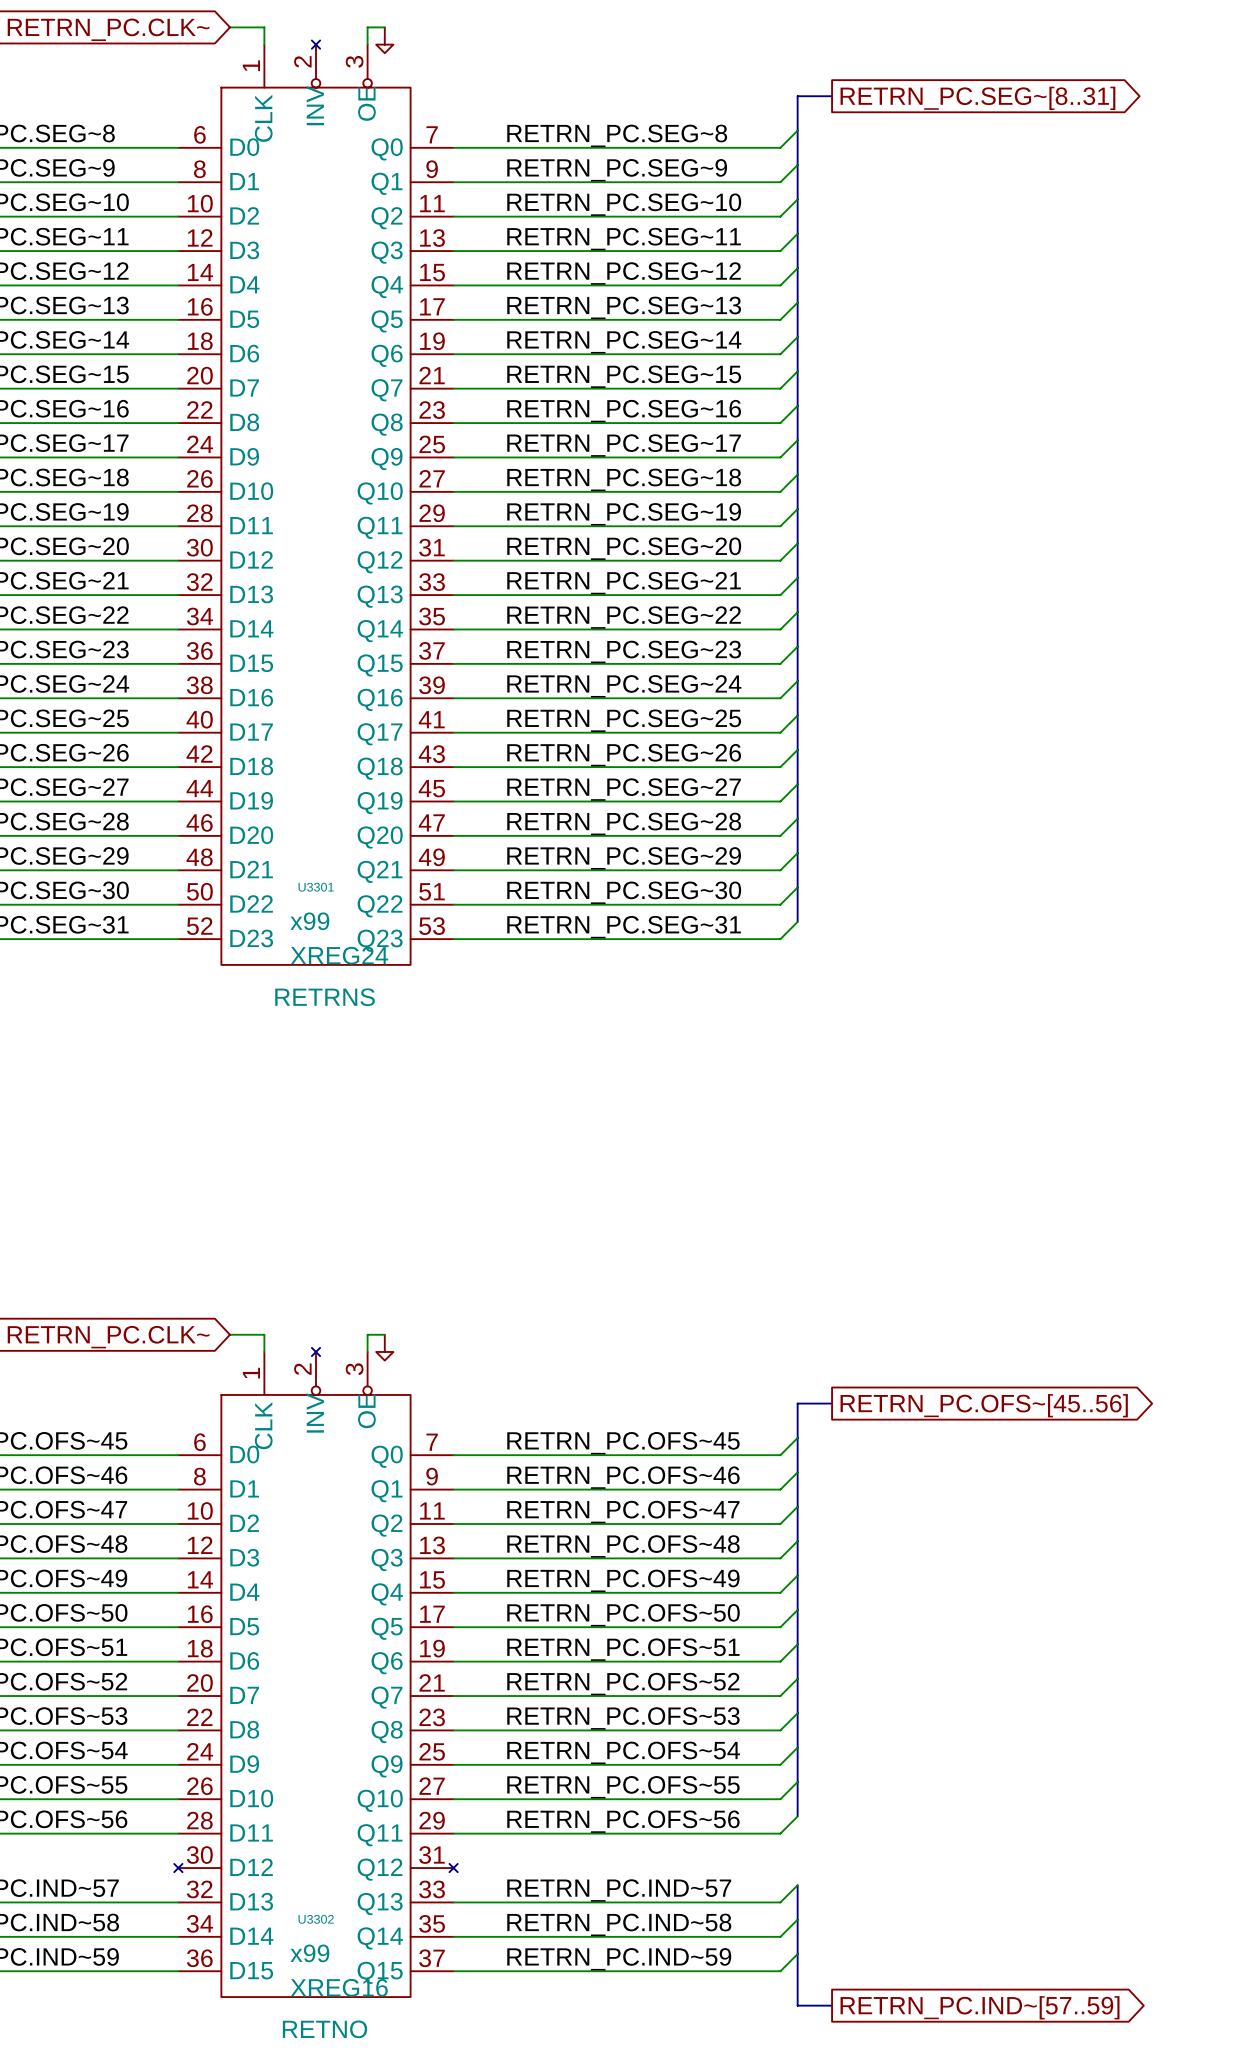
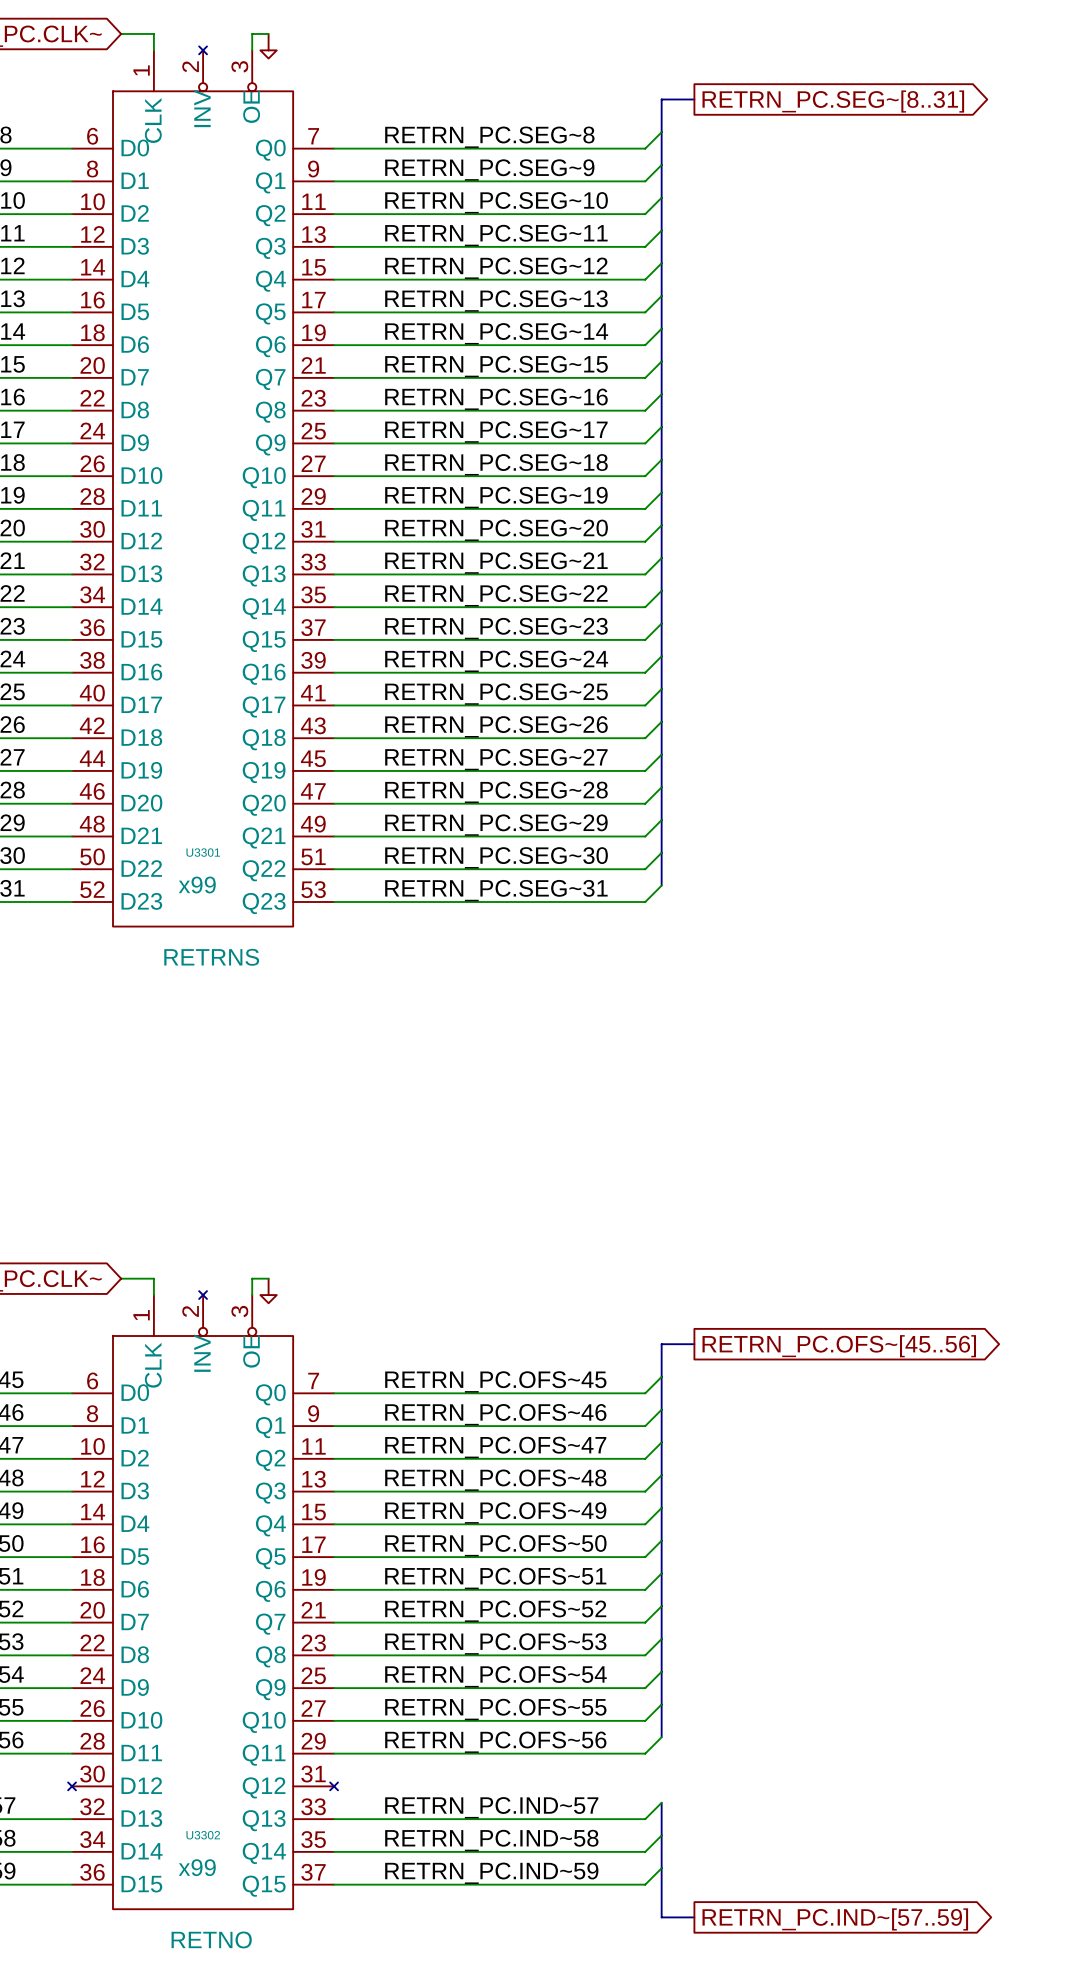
U3301 value: XREG24 (339, 955) -> none
U3302 value: XREG16 (339, 1987) -> none

